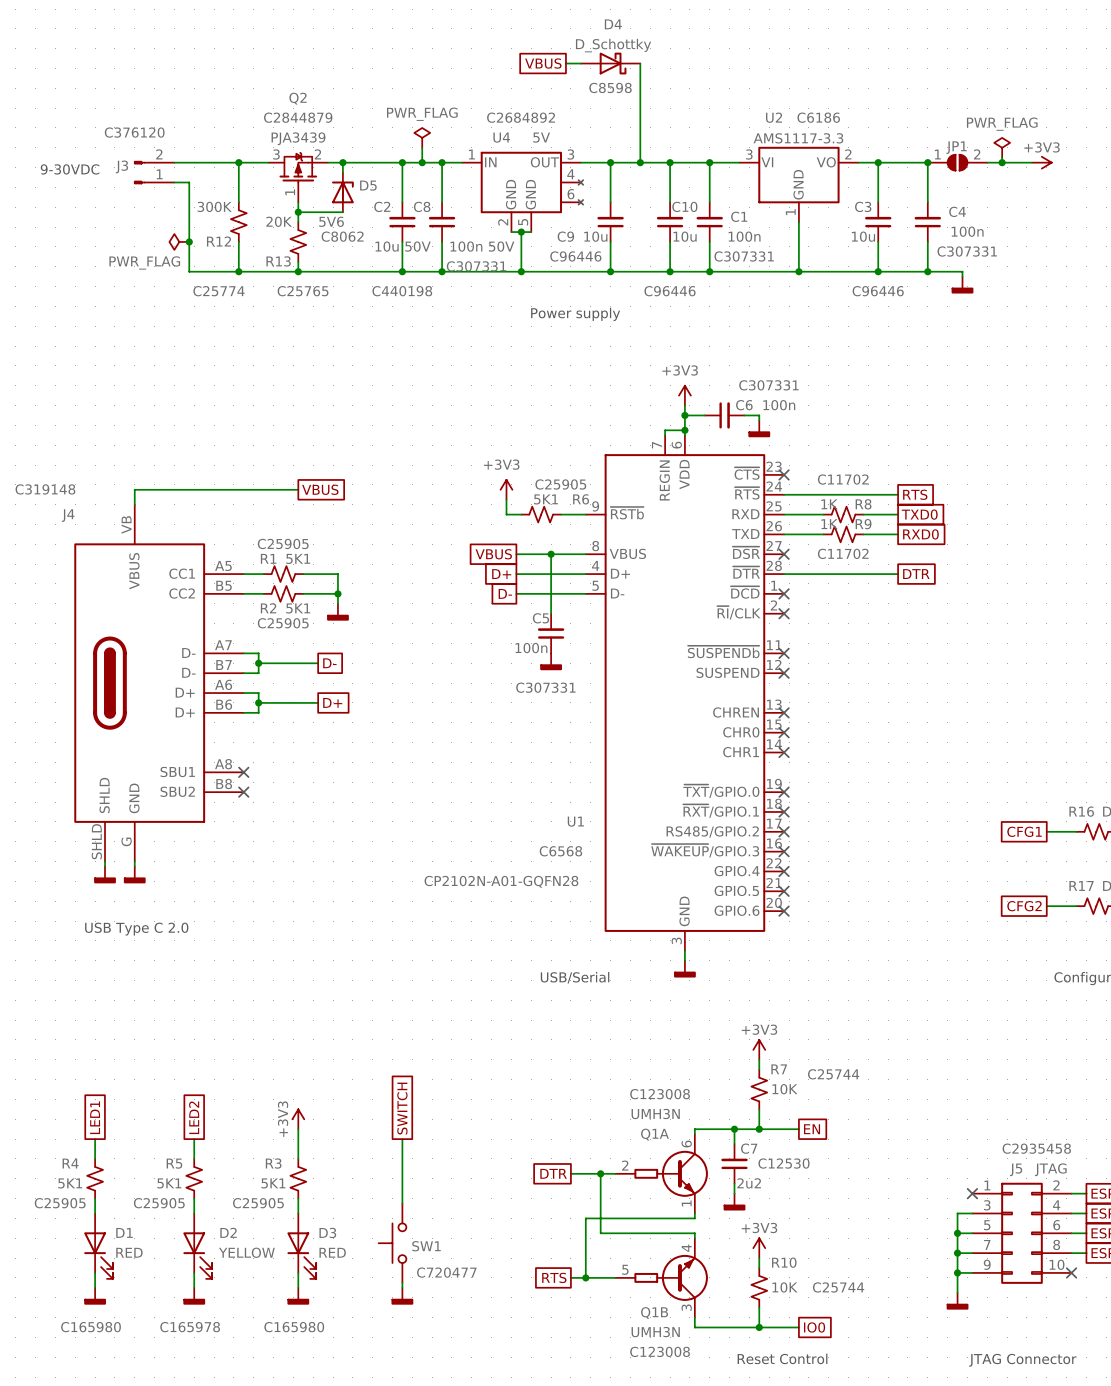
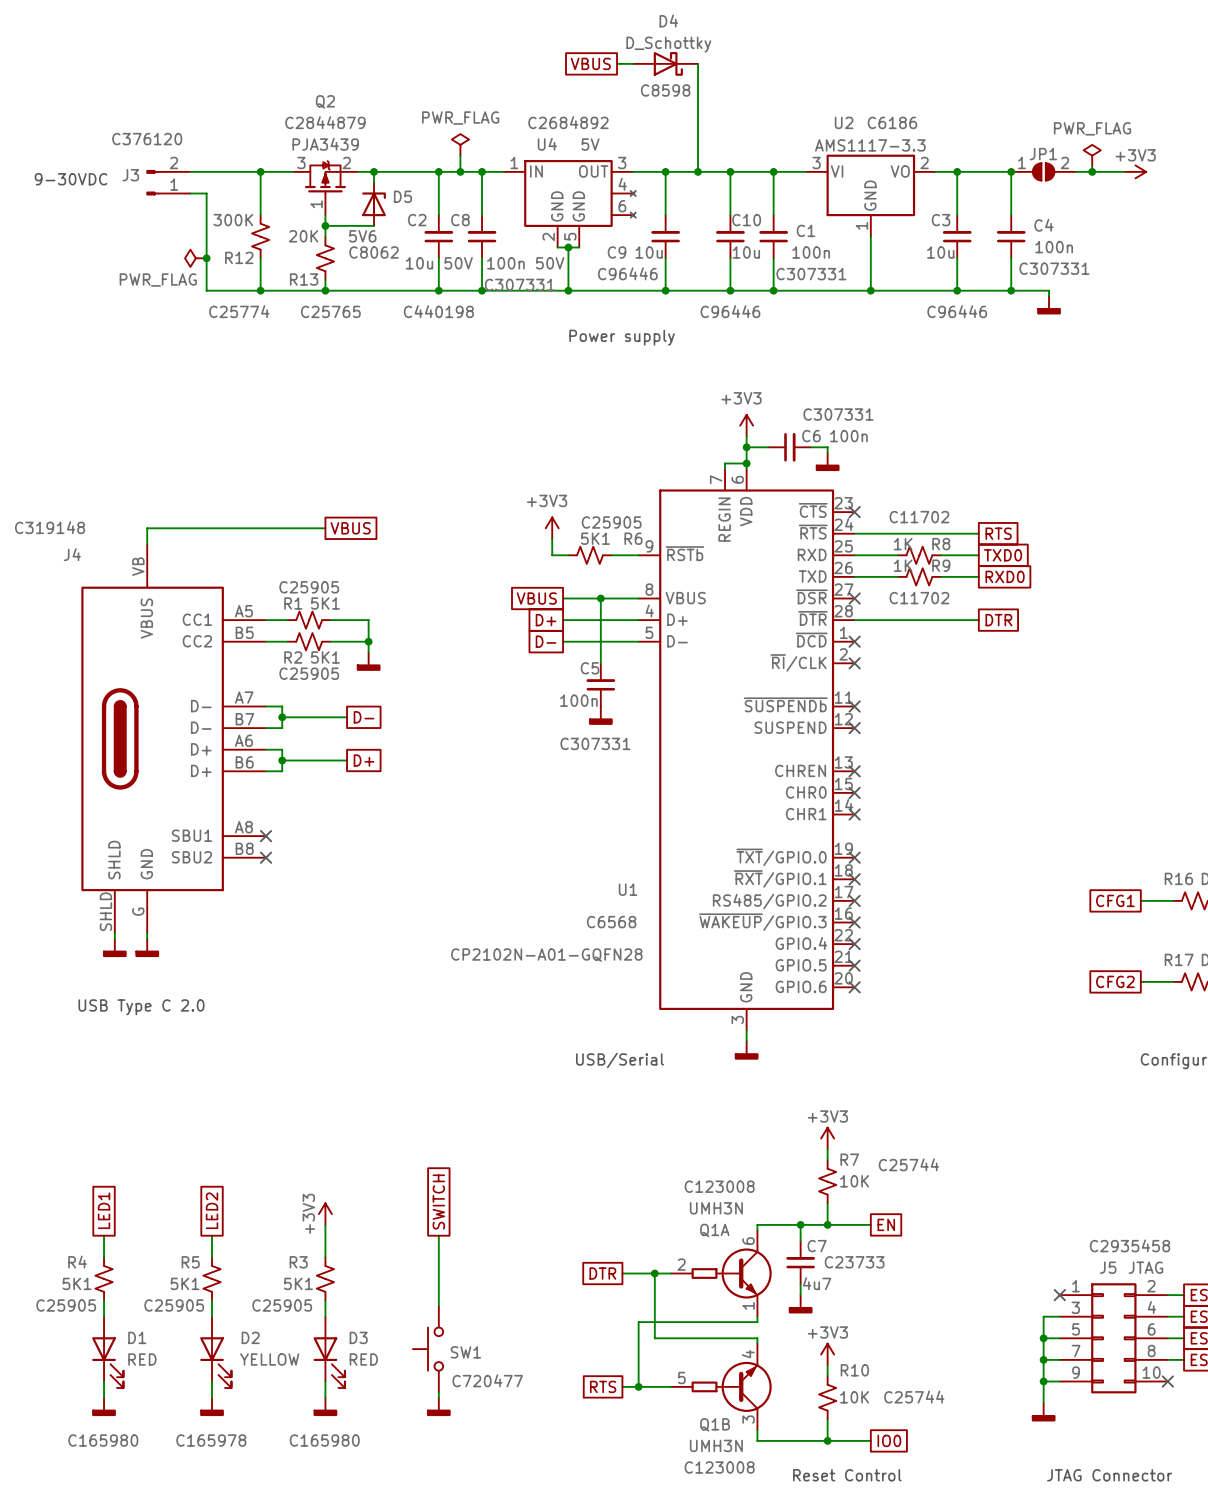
C7 text: C12530 (783, 1163) -> C23733 (854, 1262)
C7 value: 2u2 (749, 1183) -> 4u7 (817, 1283)

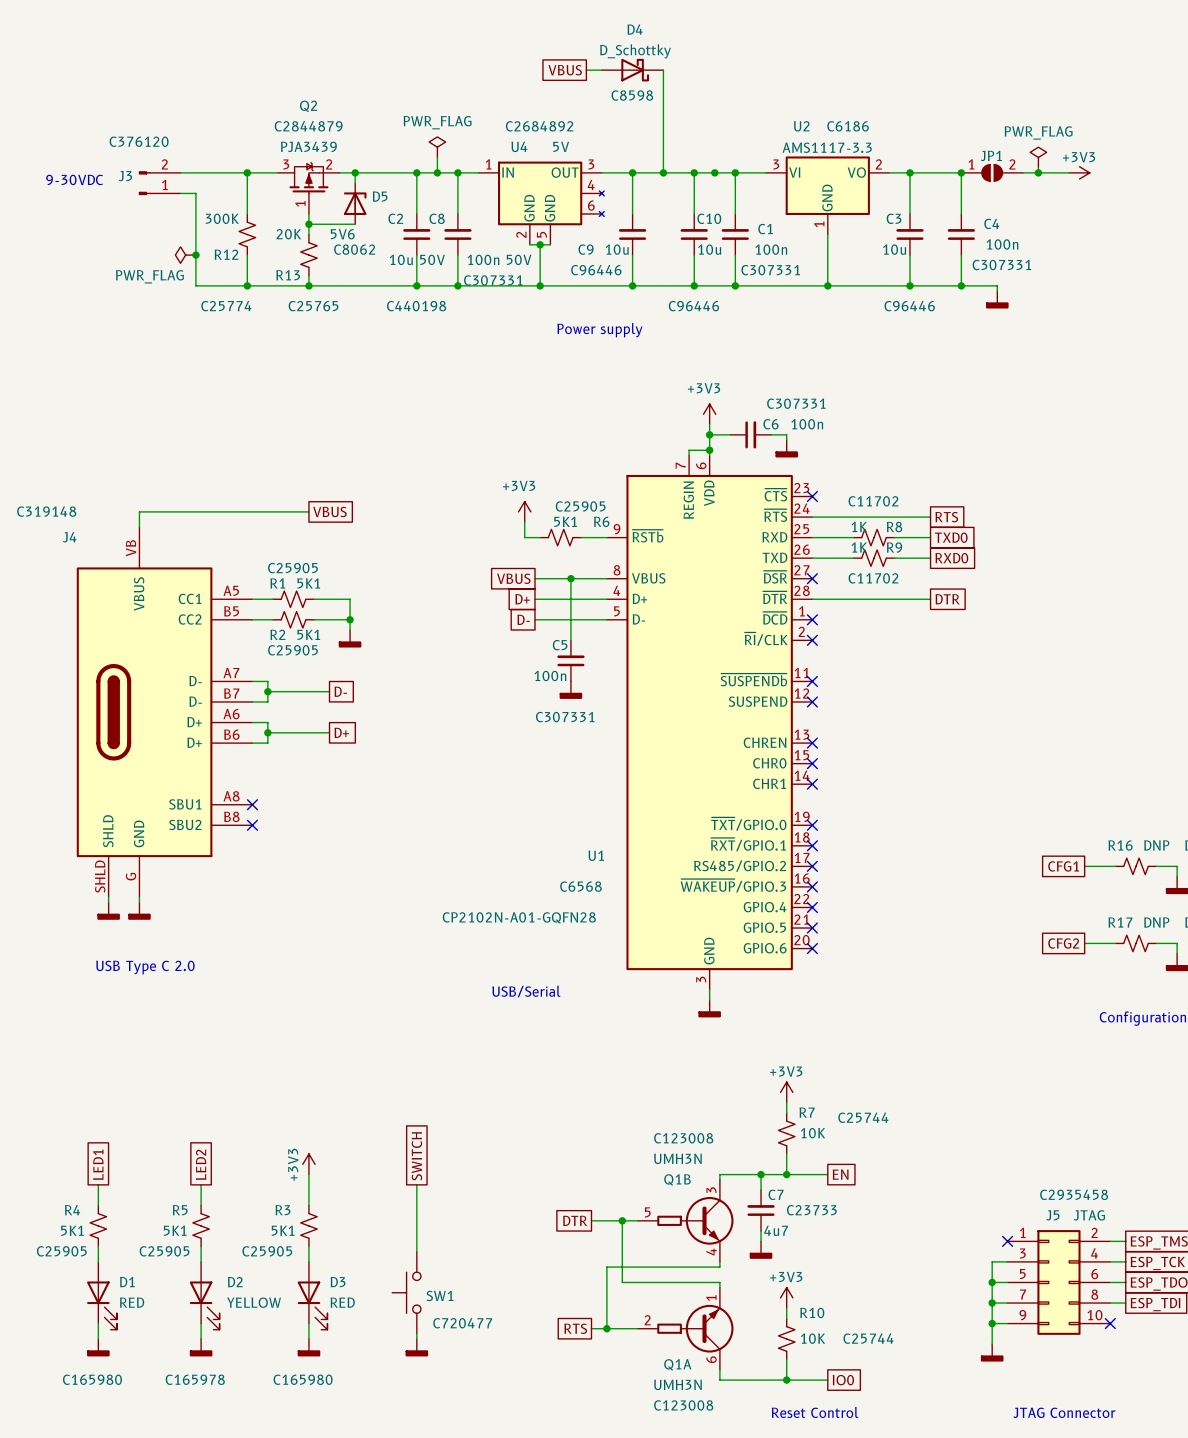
junction: none -> (714, 172)
text position: USB/Serial (620, 1060) -> USB/Serial (526, 991)
Q1A position: (721, 1273) -> (685, 1328)
Q1A flip: as is (731, 1273) -> up-down (695, 1328)
Q1B position: (721, 1386) -> (685, 1220)
Q1B flip: as is (731, 1386) -> up-down (695, 1220)

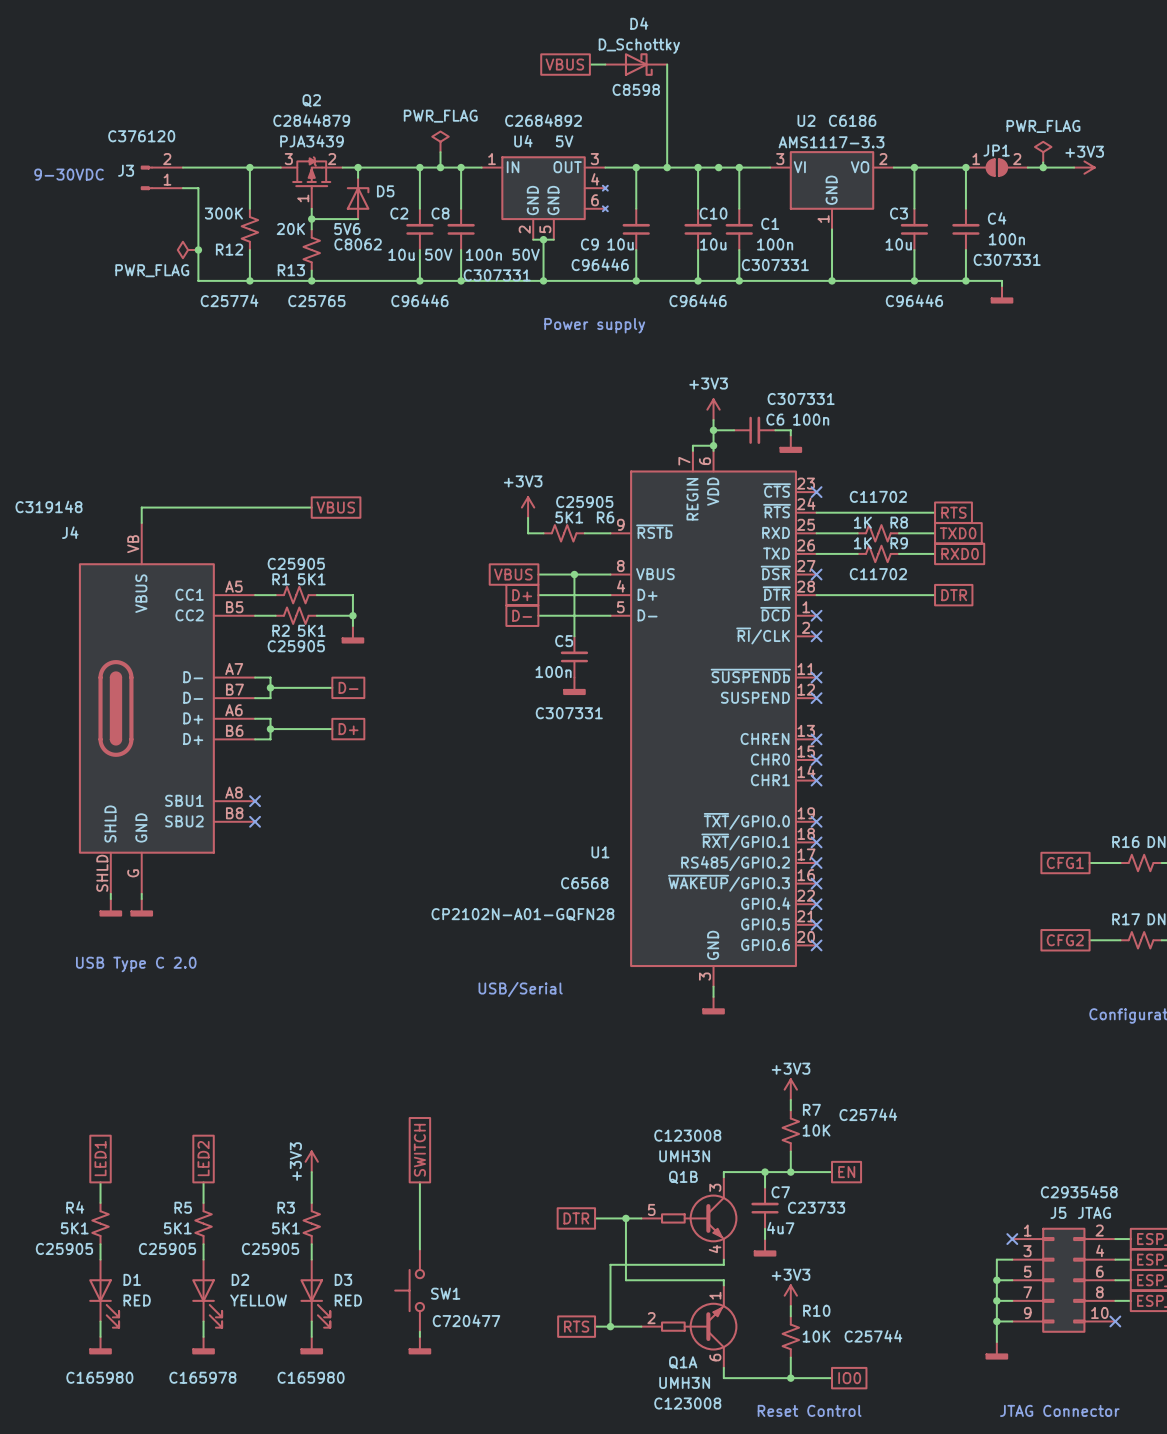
C2 text: C440198 (416, 306) -> C96446 (419, 300)

